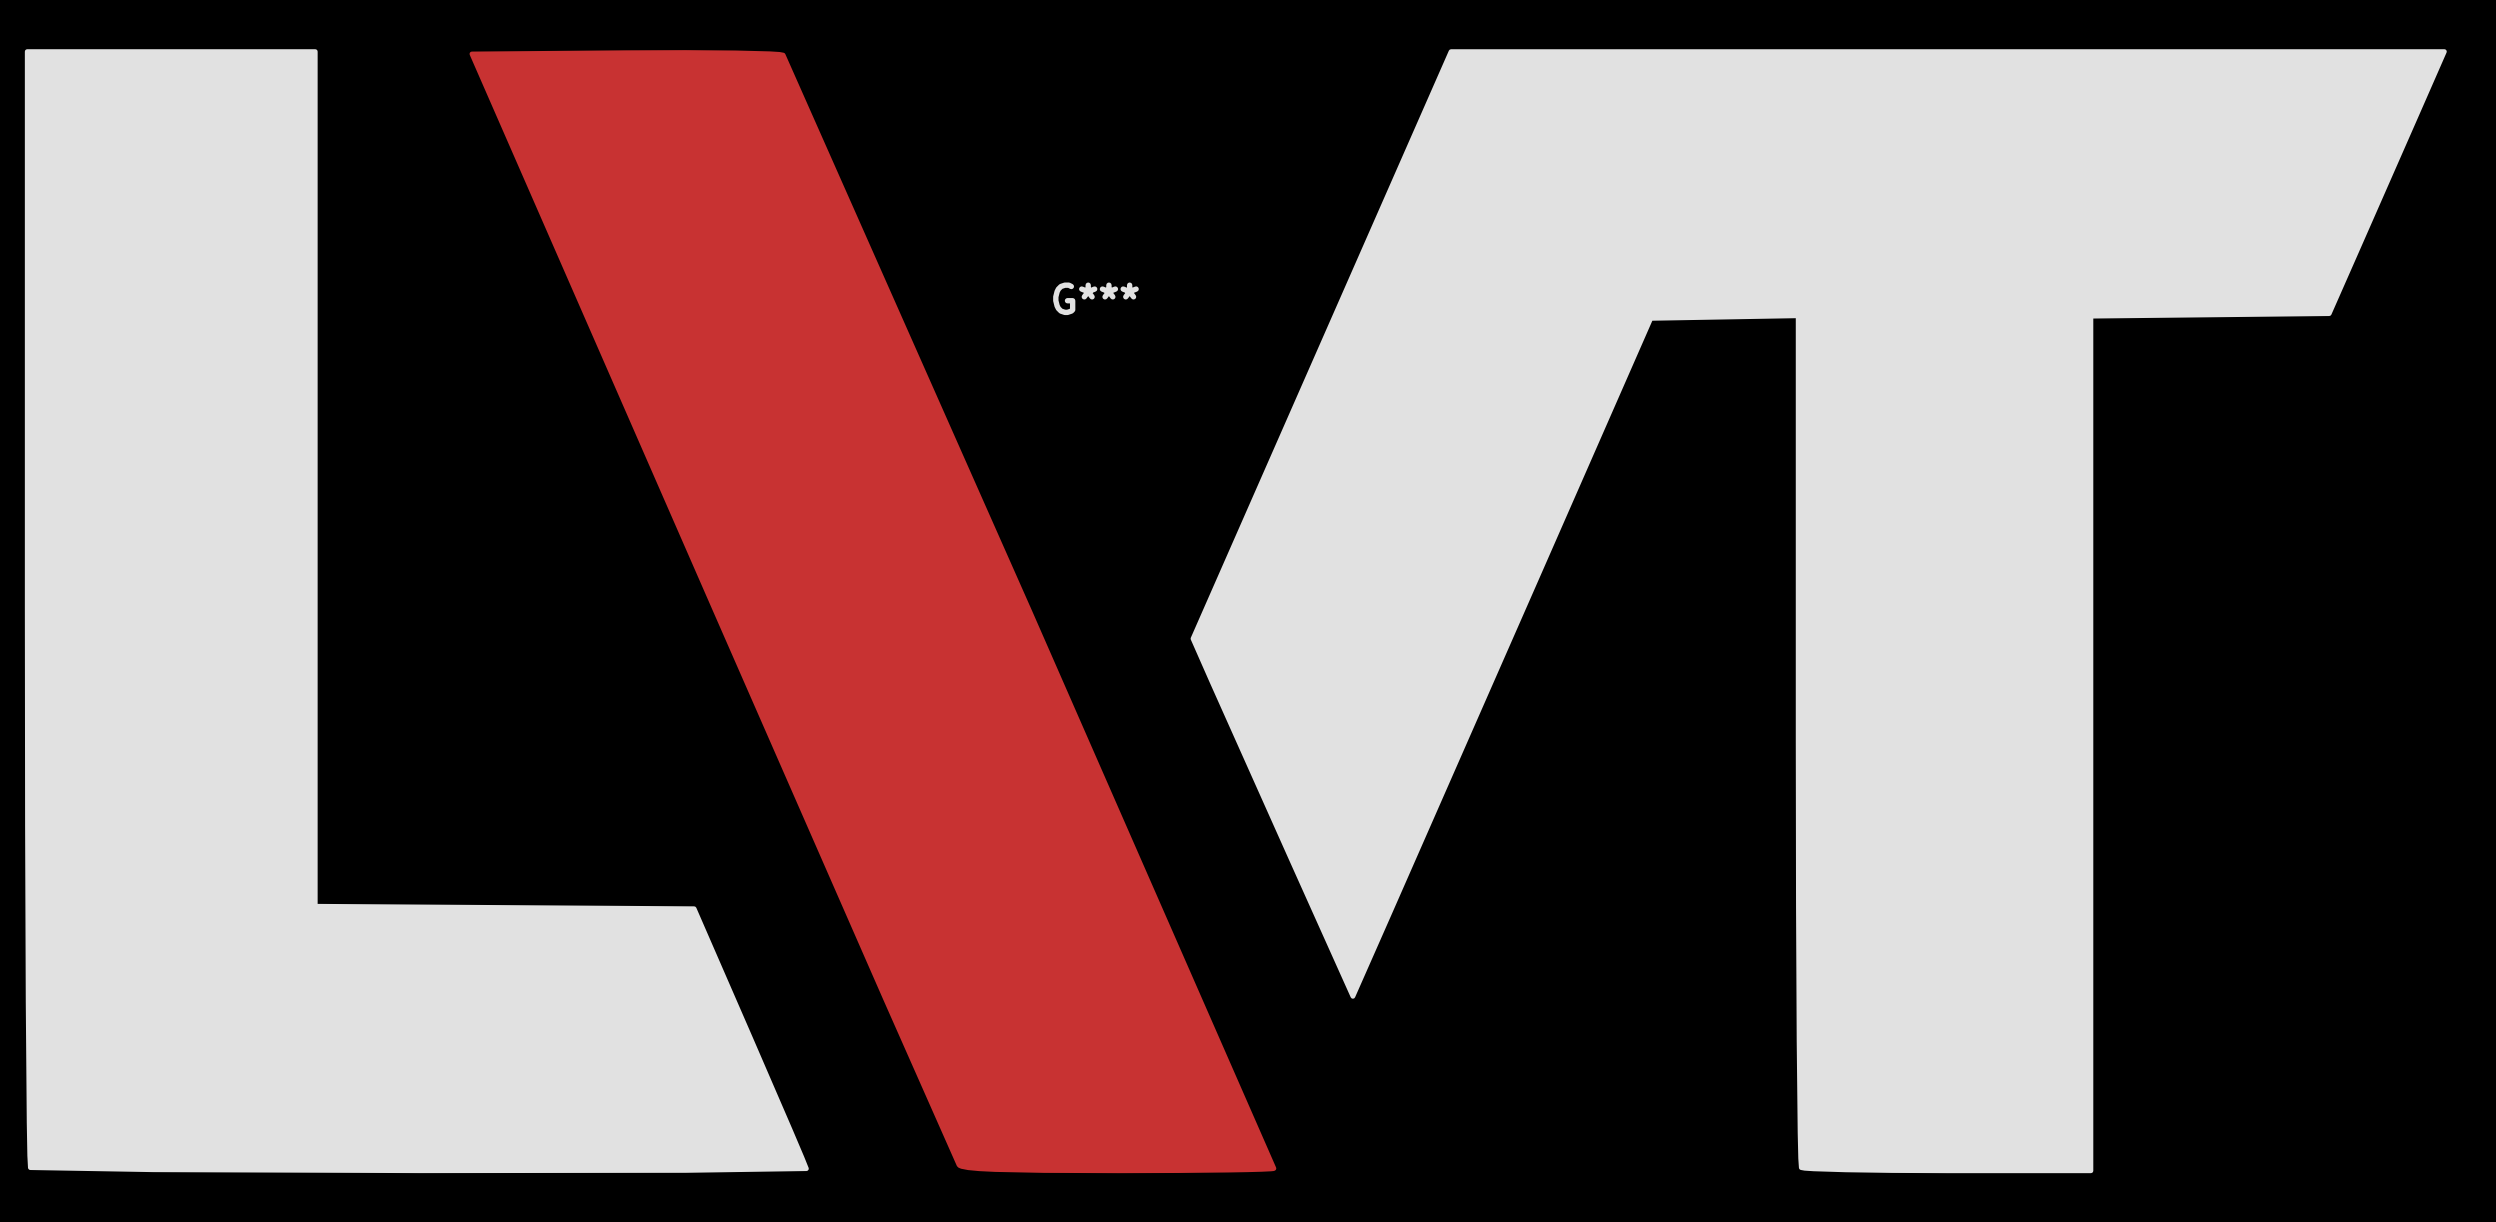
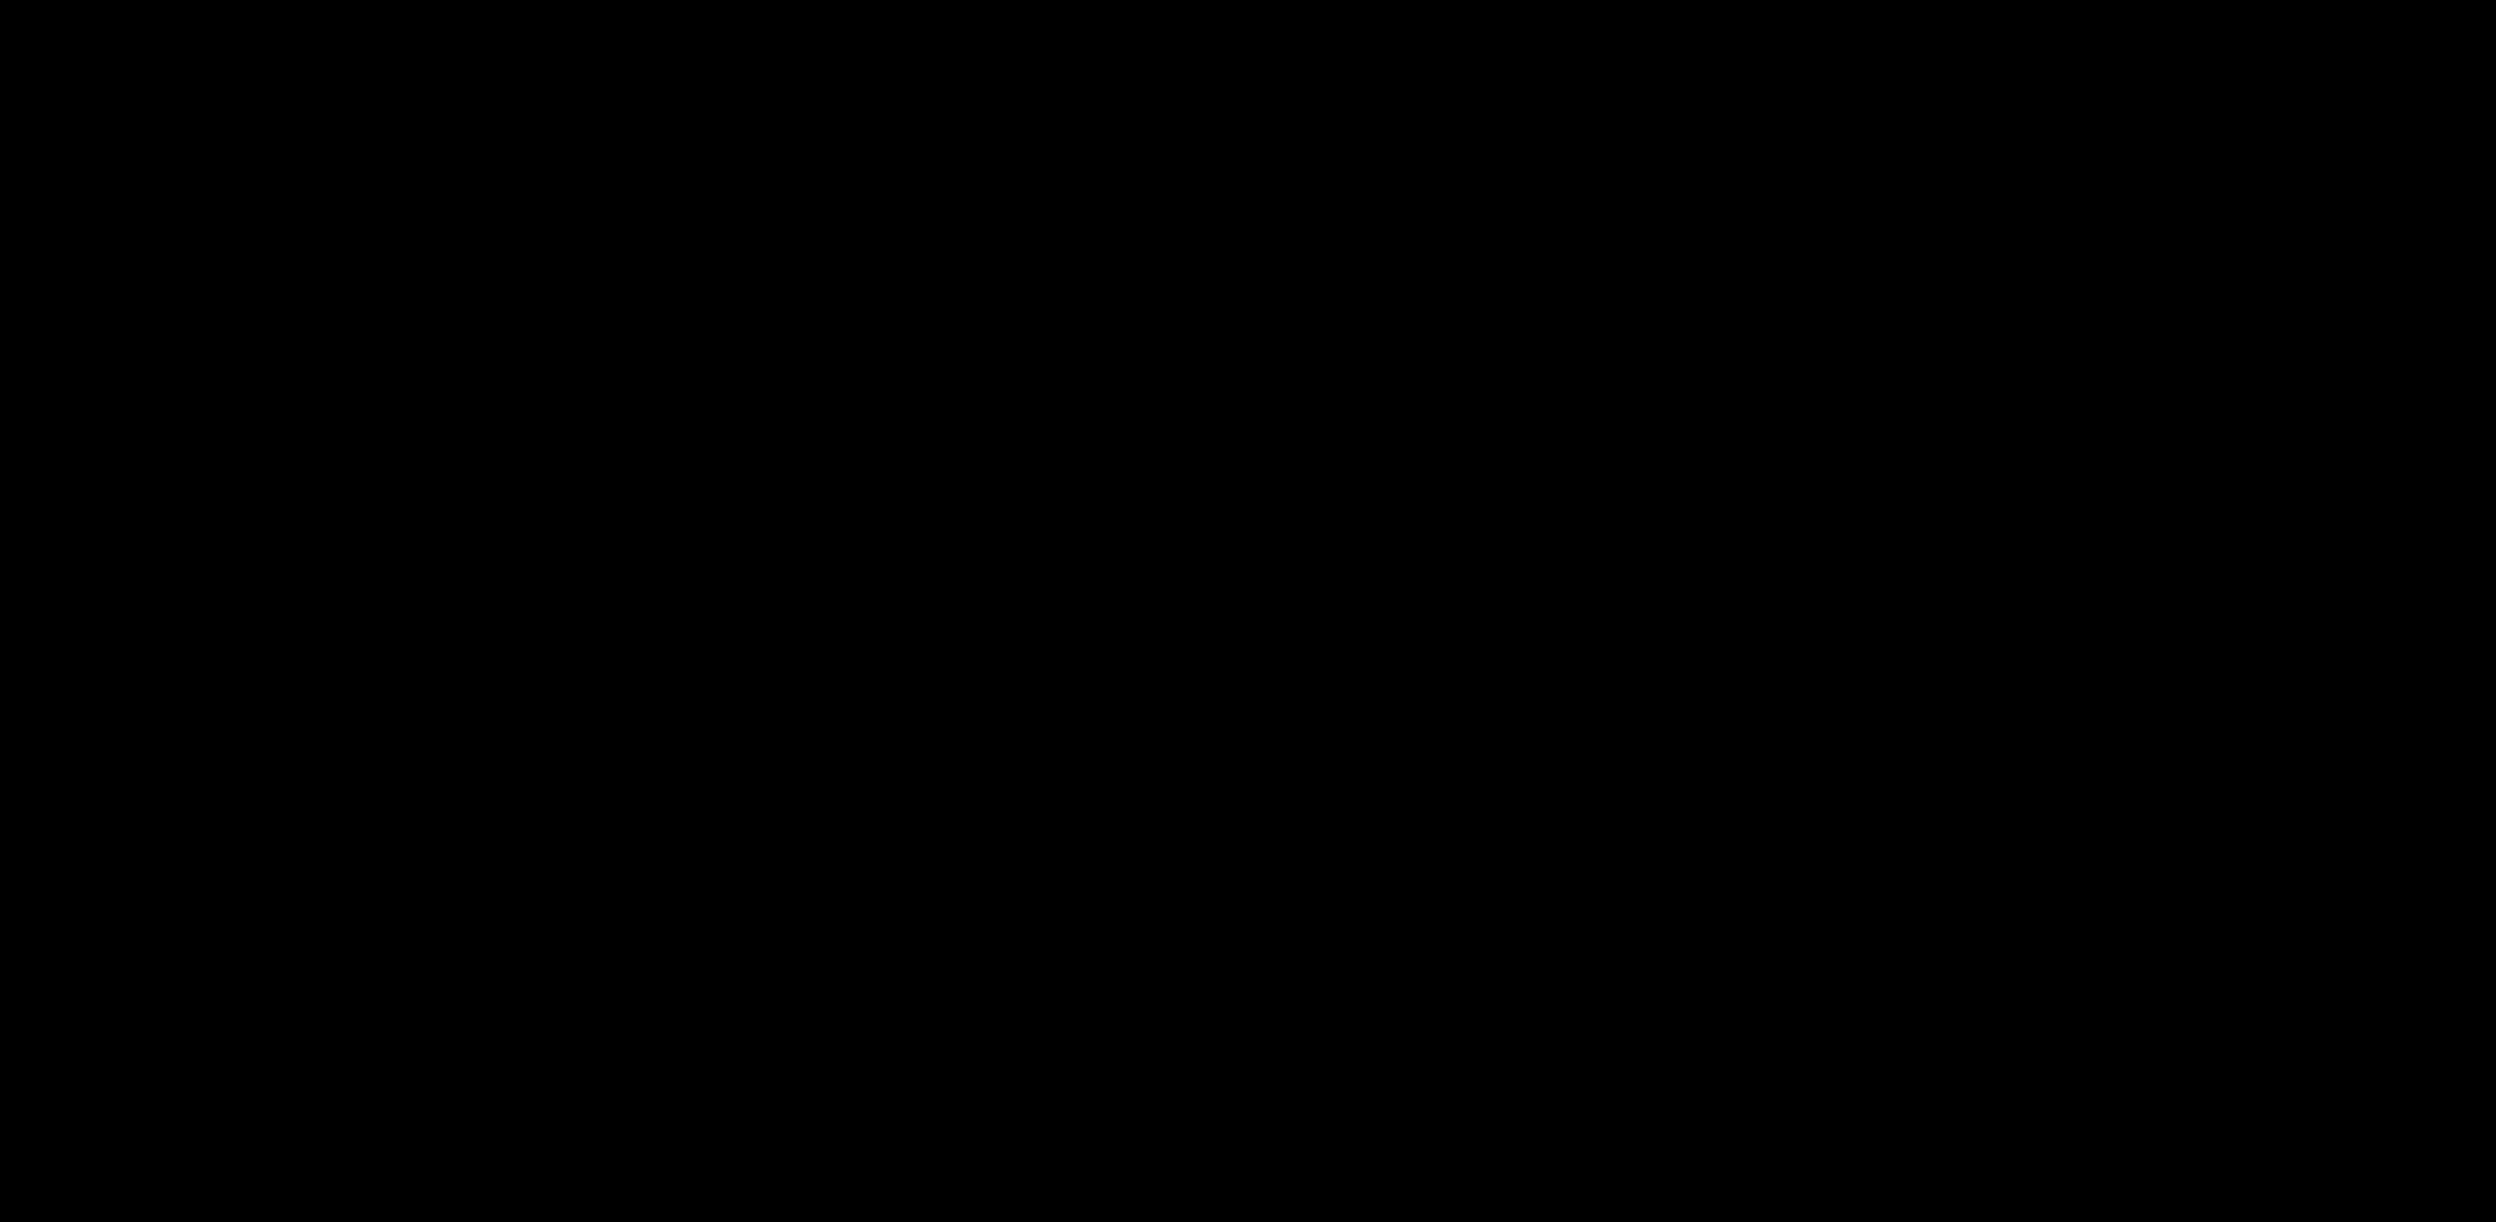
G***: (1235, 611) -> none

